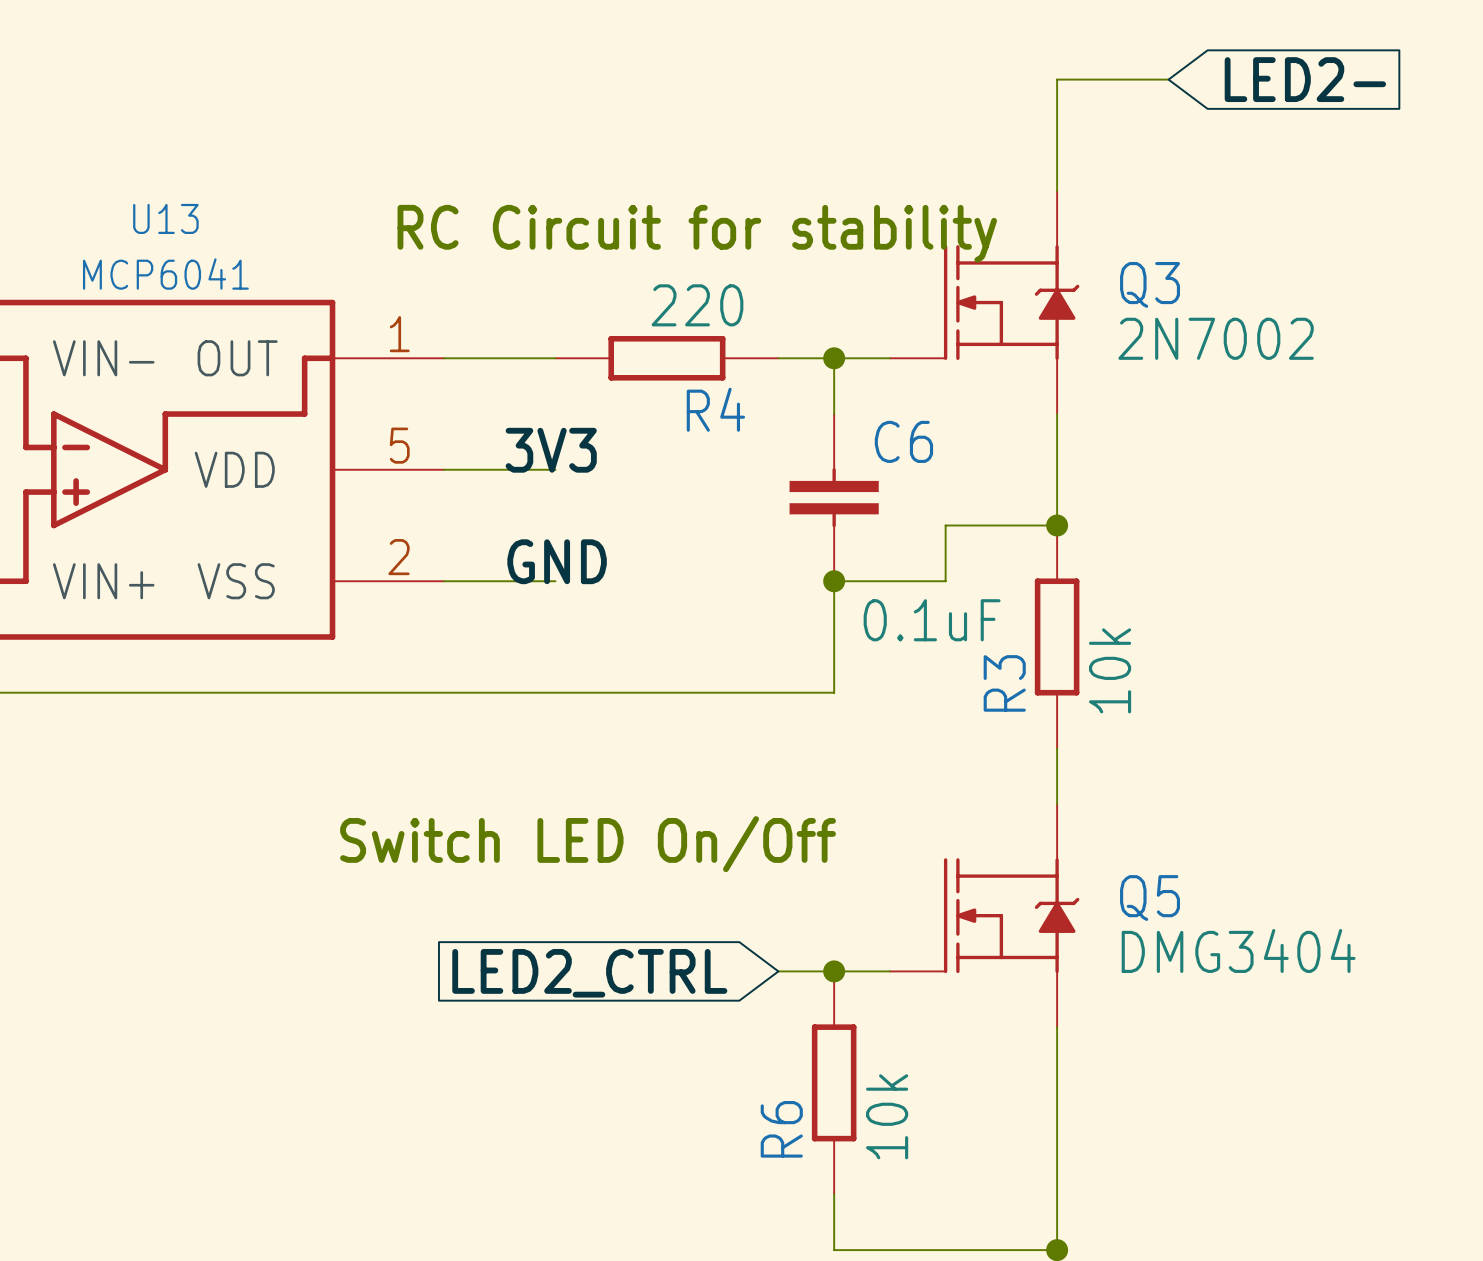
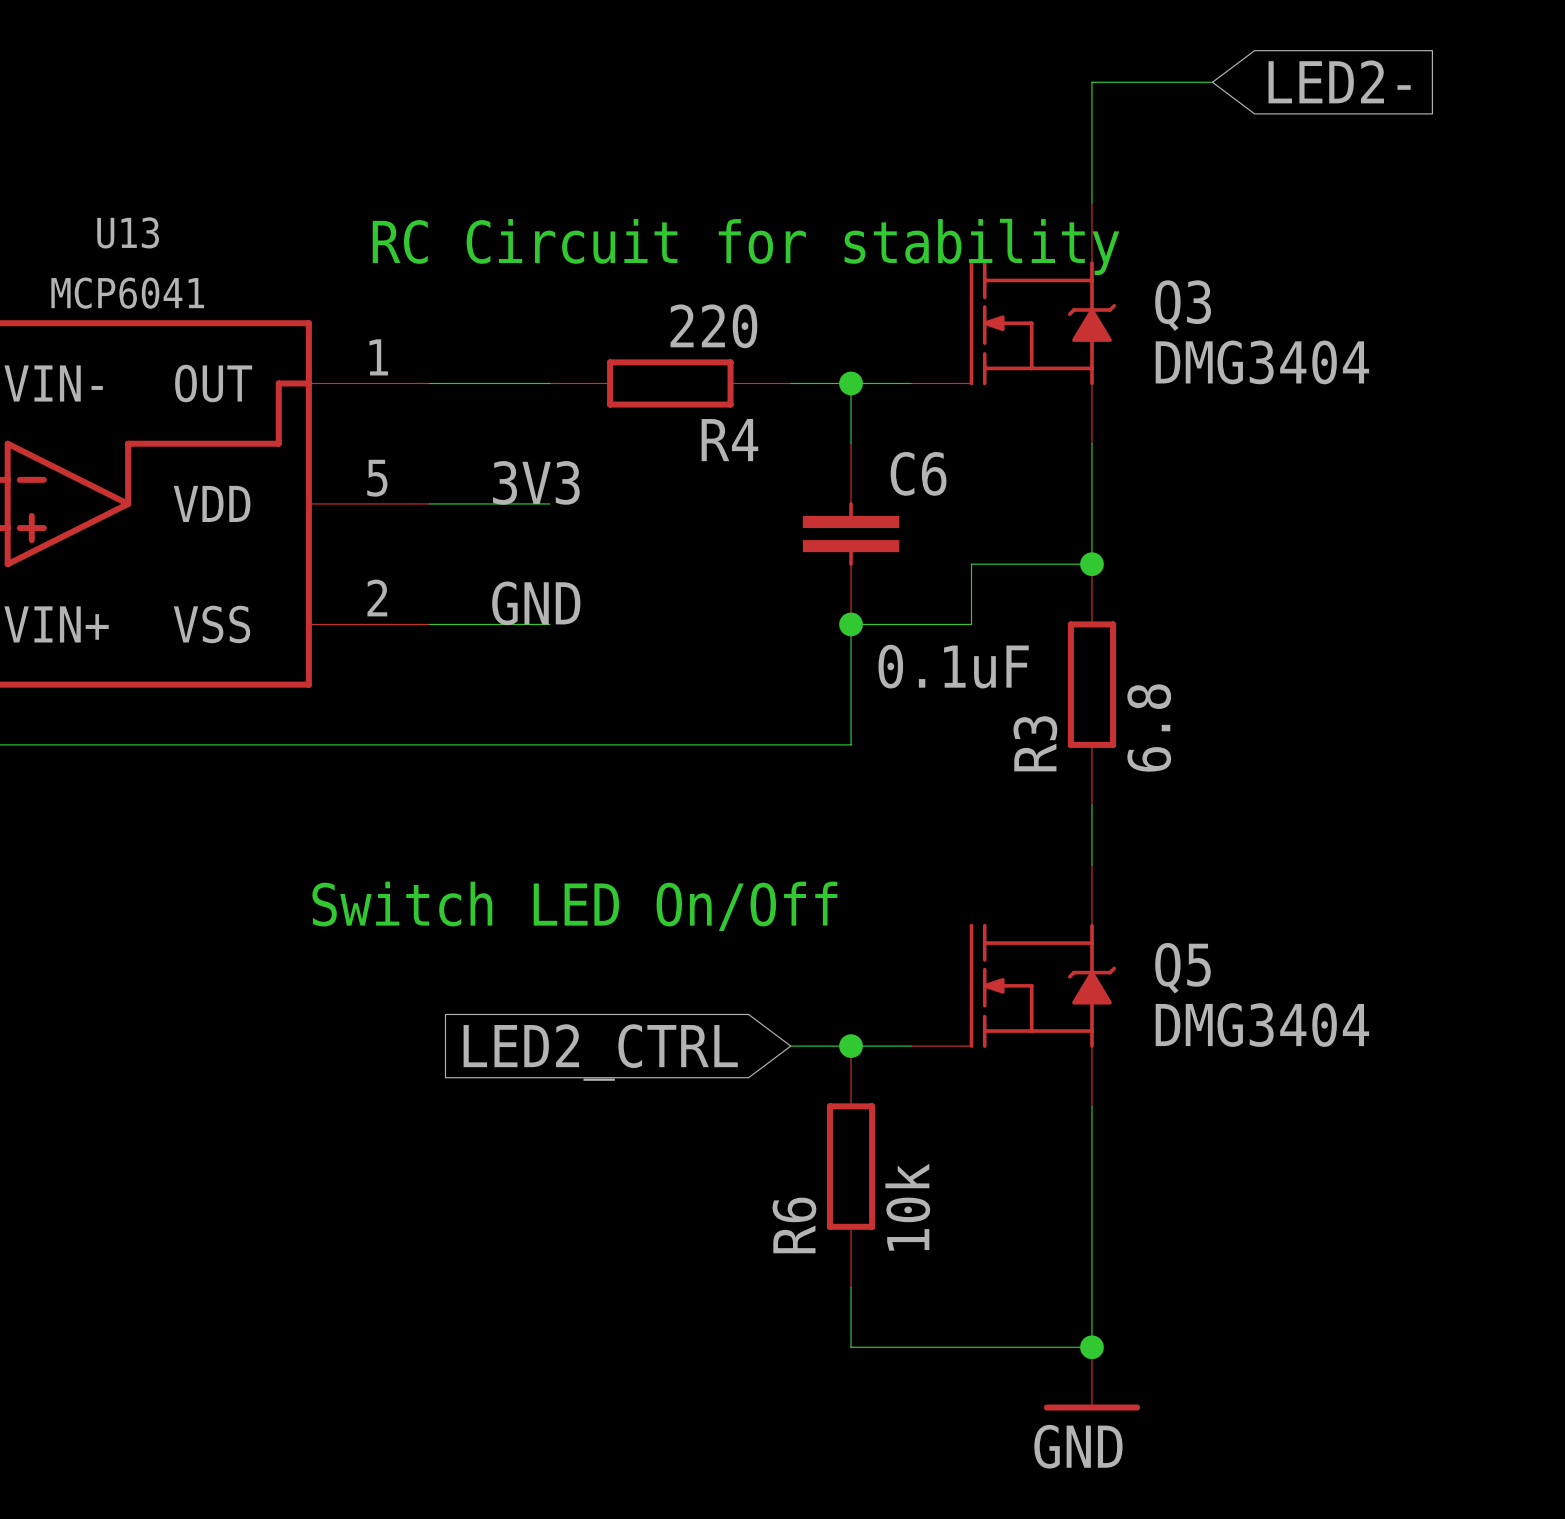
Q3 value: 2N7002 (1216, 338) -> DMG3404 (1262, 362)
R3 value: 10k (1110, 670) -> 6.8 (1149, 727)

